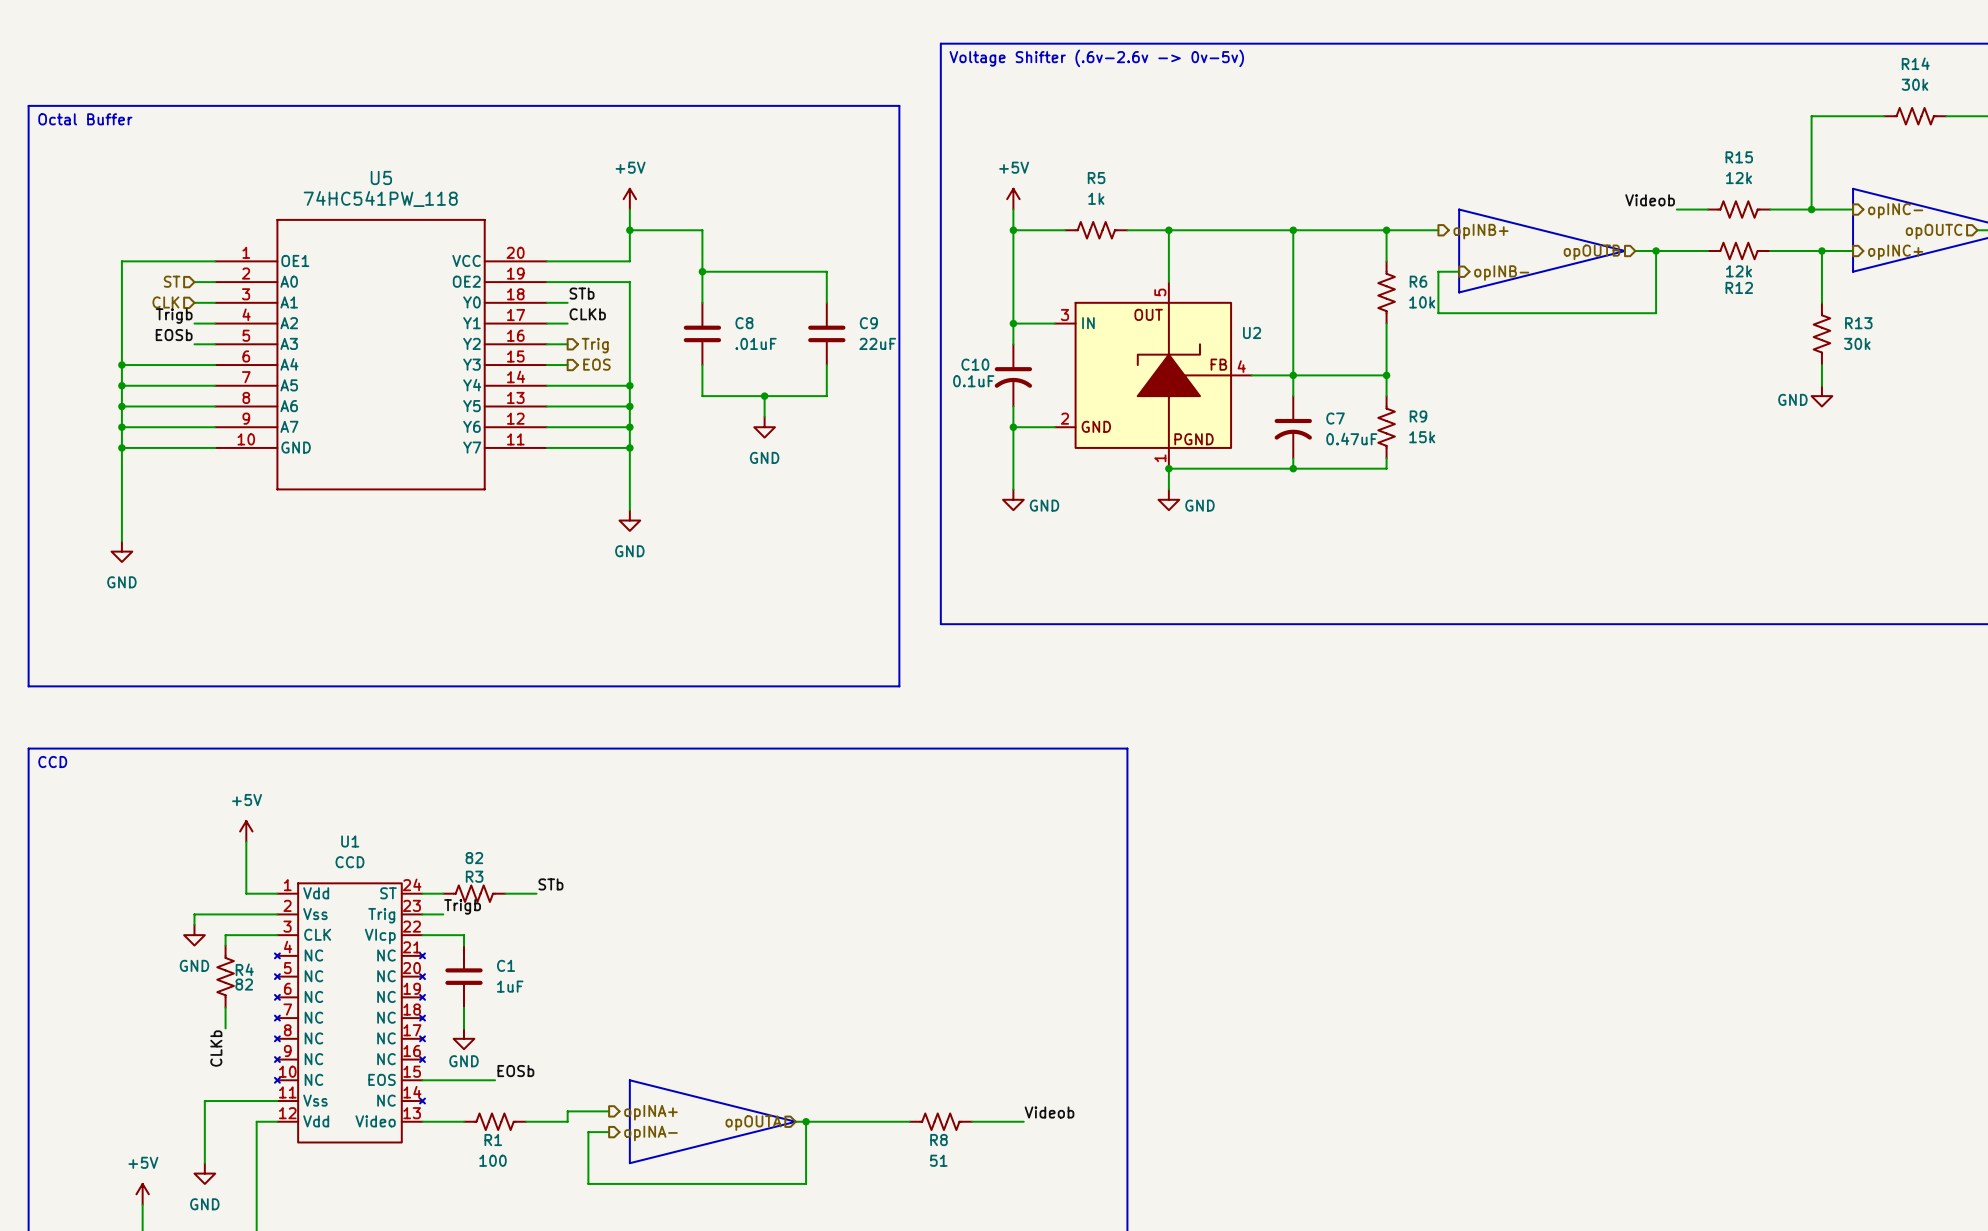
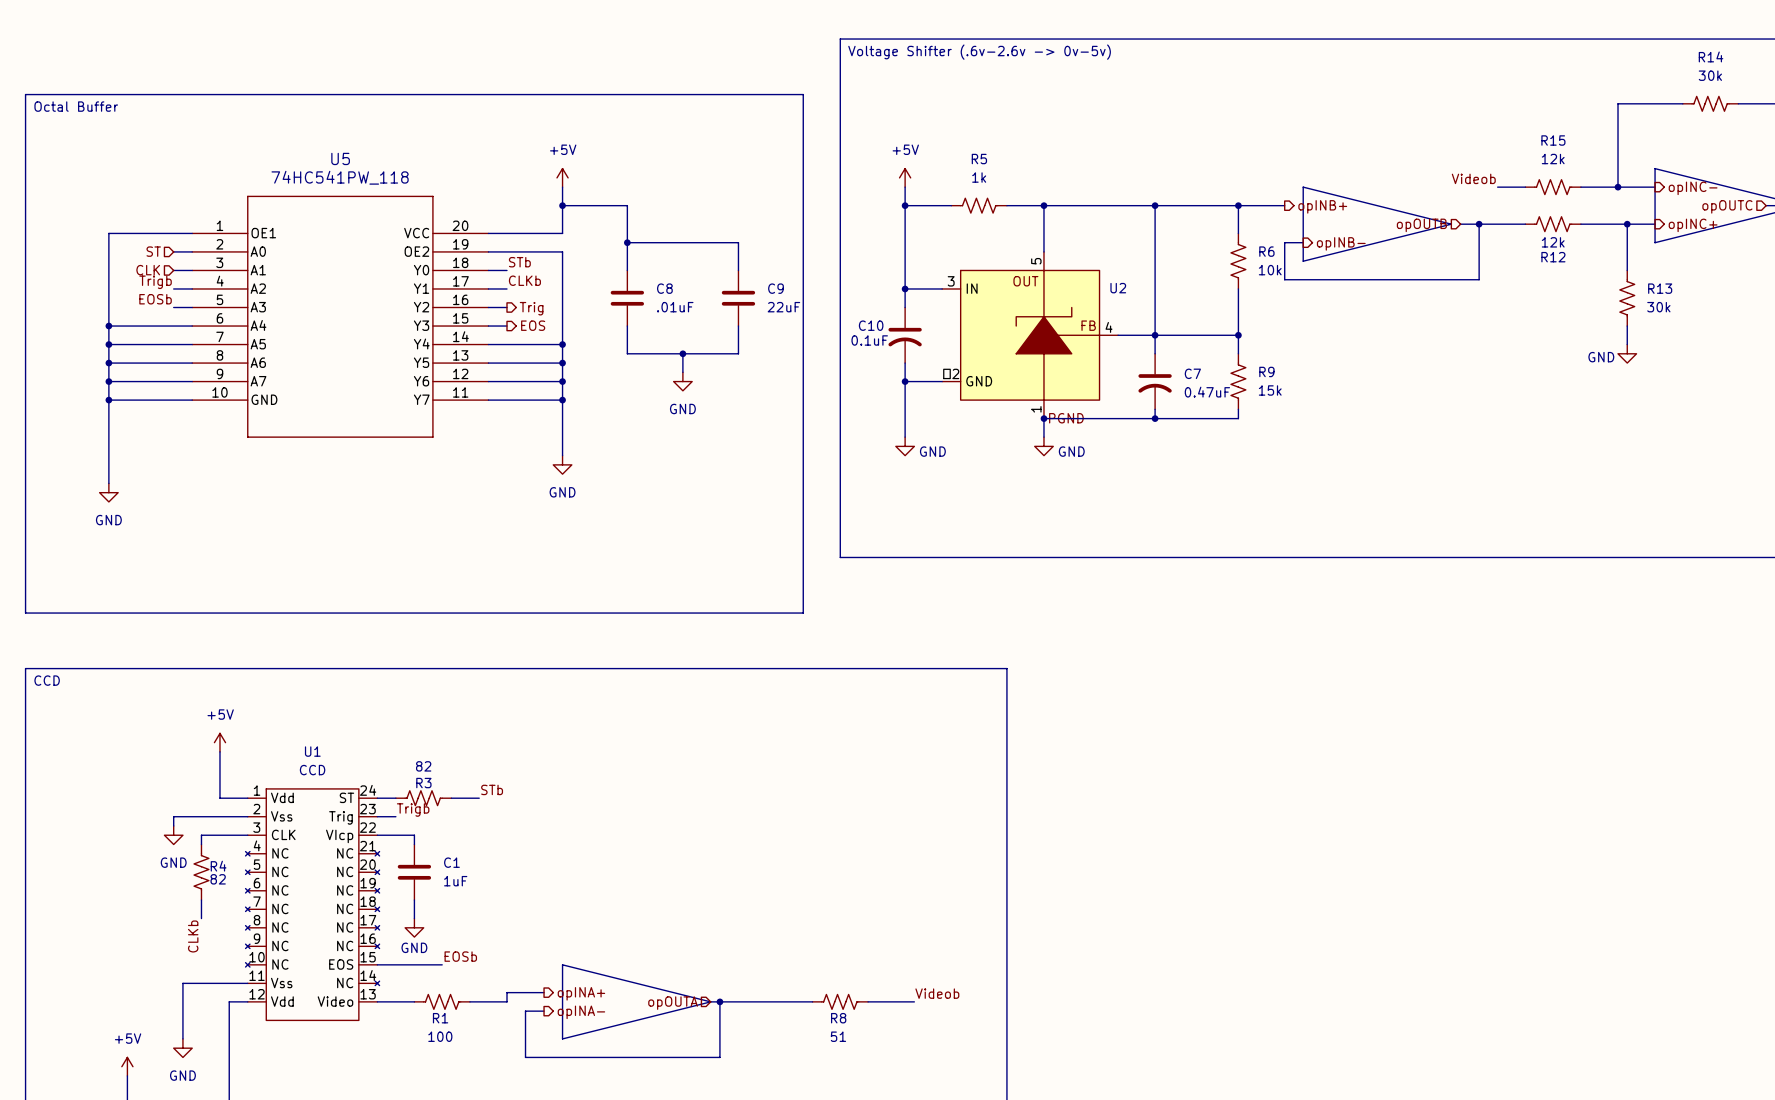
U2 symbol: [1054, 282, 1252, 469] -> [942, 251, 1119, 419]

